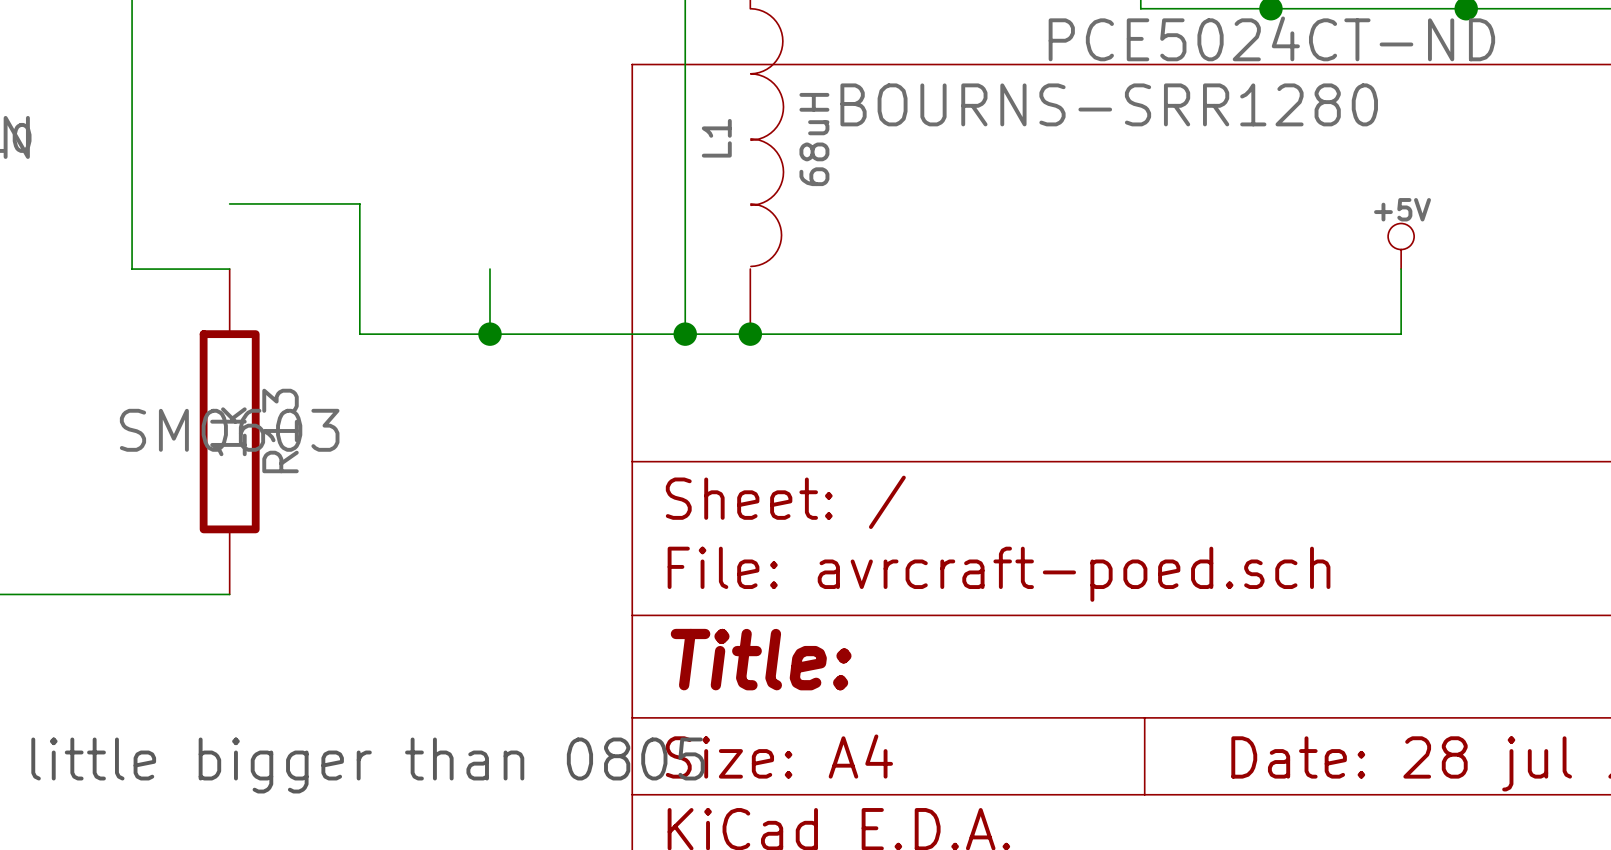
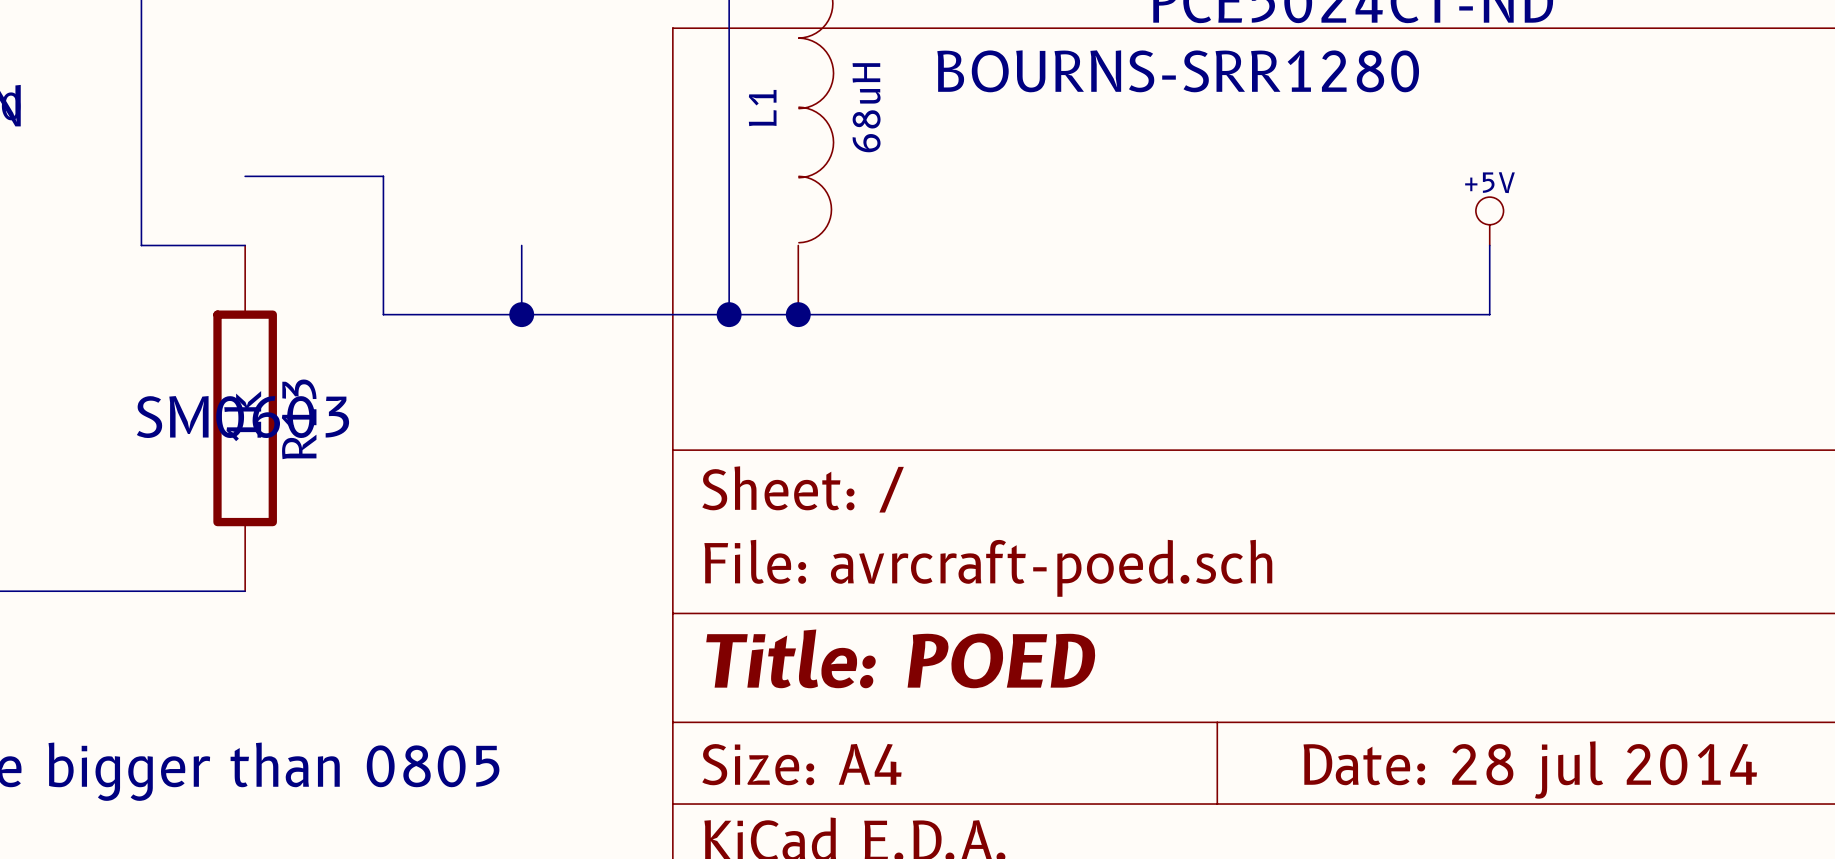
title block: Title: (761, 659) -> Title: POED (900, 658)

